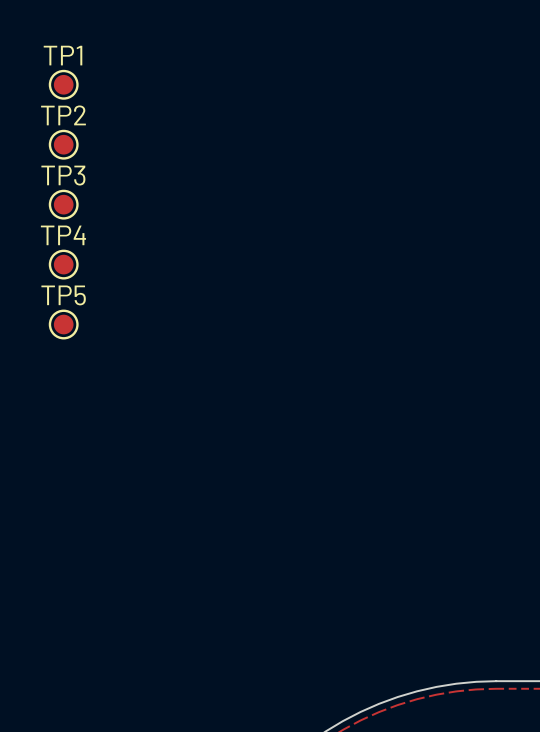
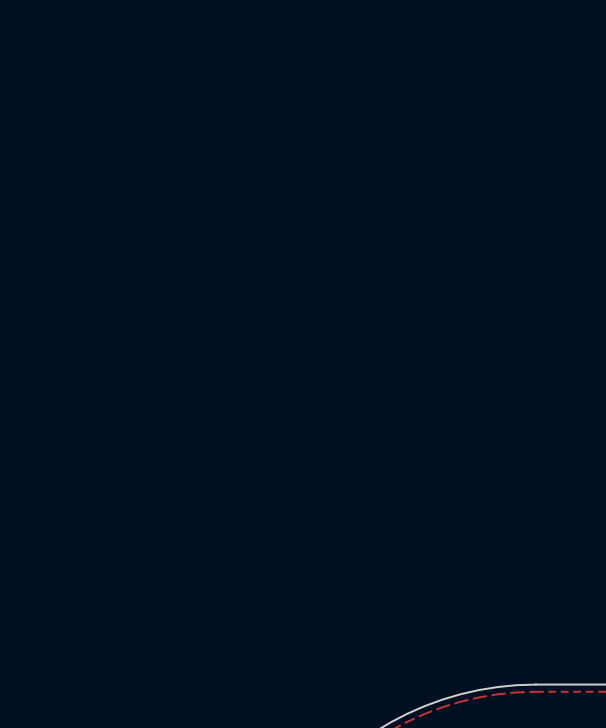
TP1: (63, 84) -> none
TP2: (63, 144) -> none
TP3: (63, 204) -> none
TP4: (63, 264) -> none
TP5: (63, 324) -> none

